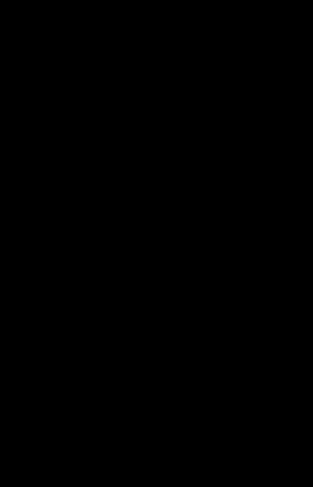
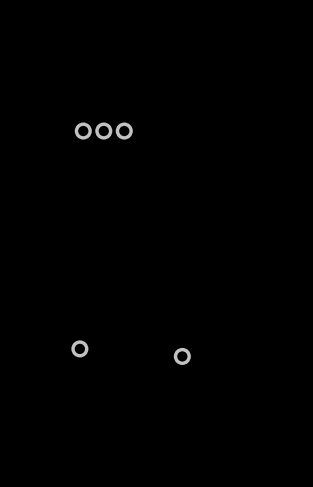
via: none -> (83, 131)
via: none -> (103, 131)
via: none -> (124, 131)
via: none -> (79, 348)
via: none -> (182, 356)

